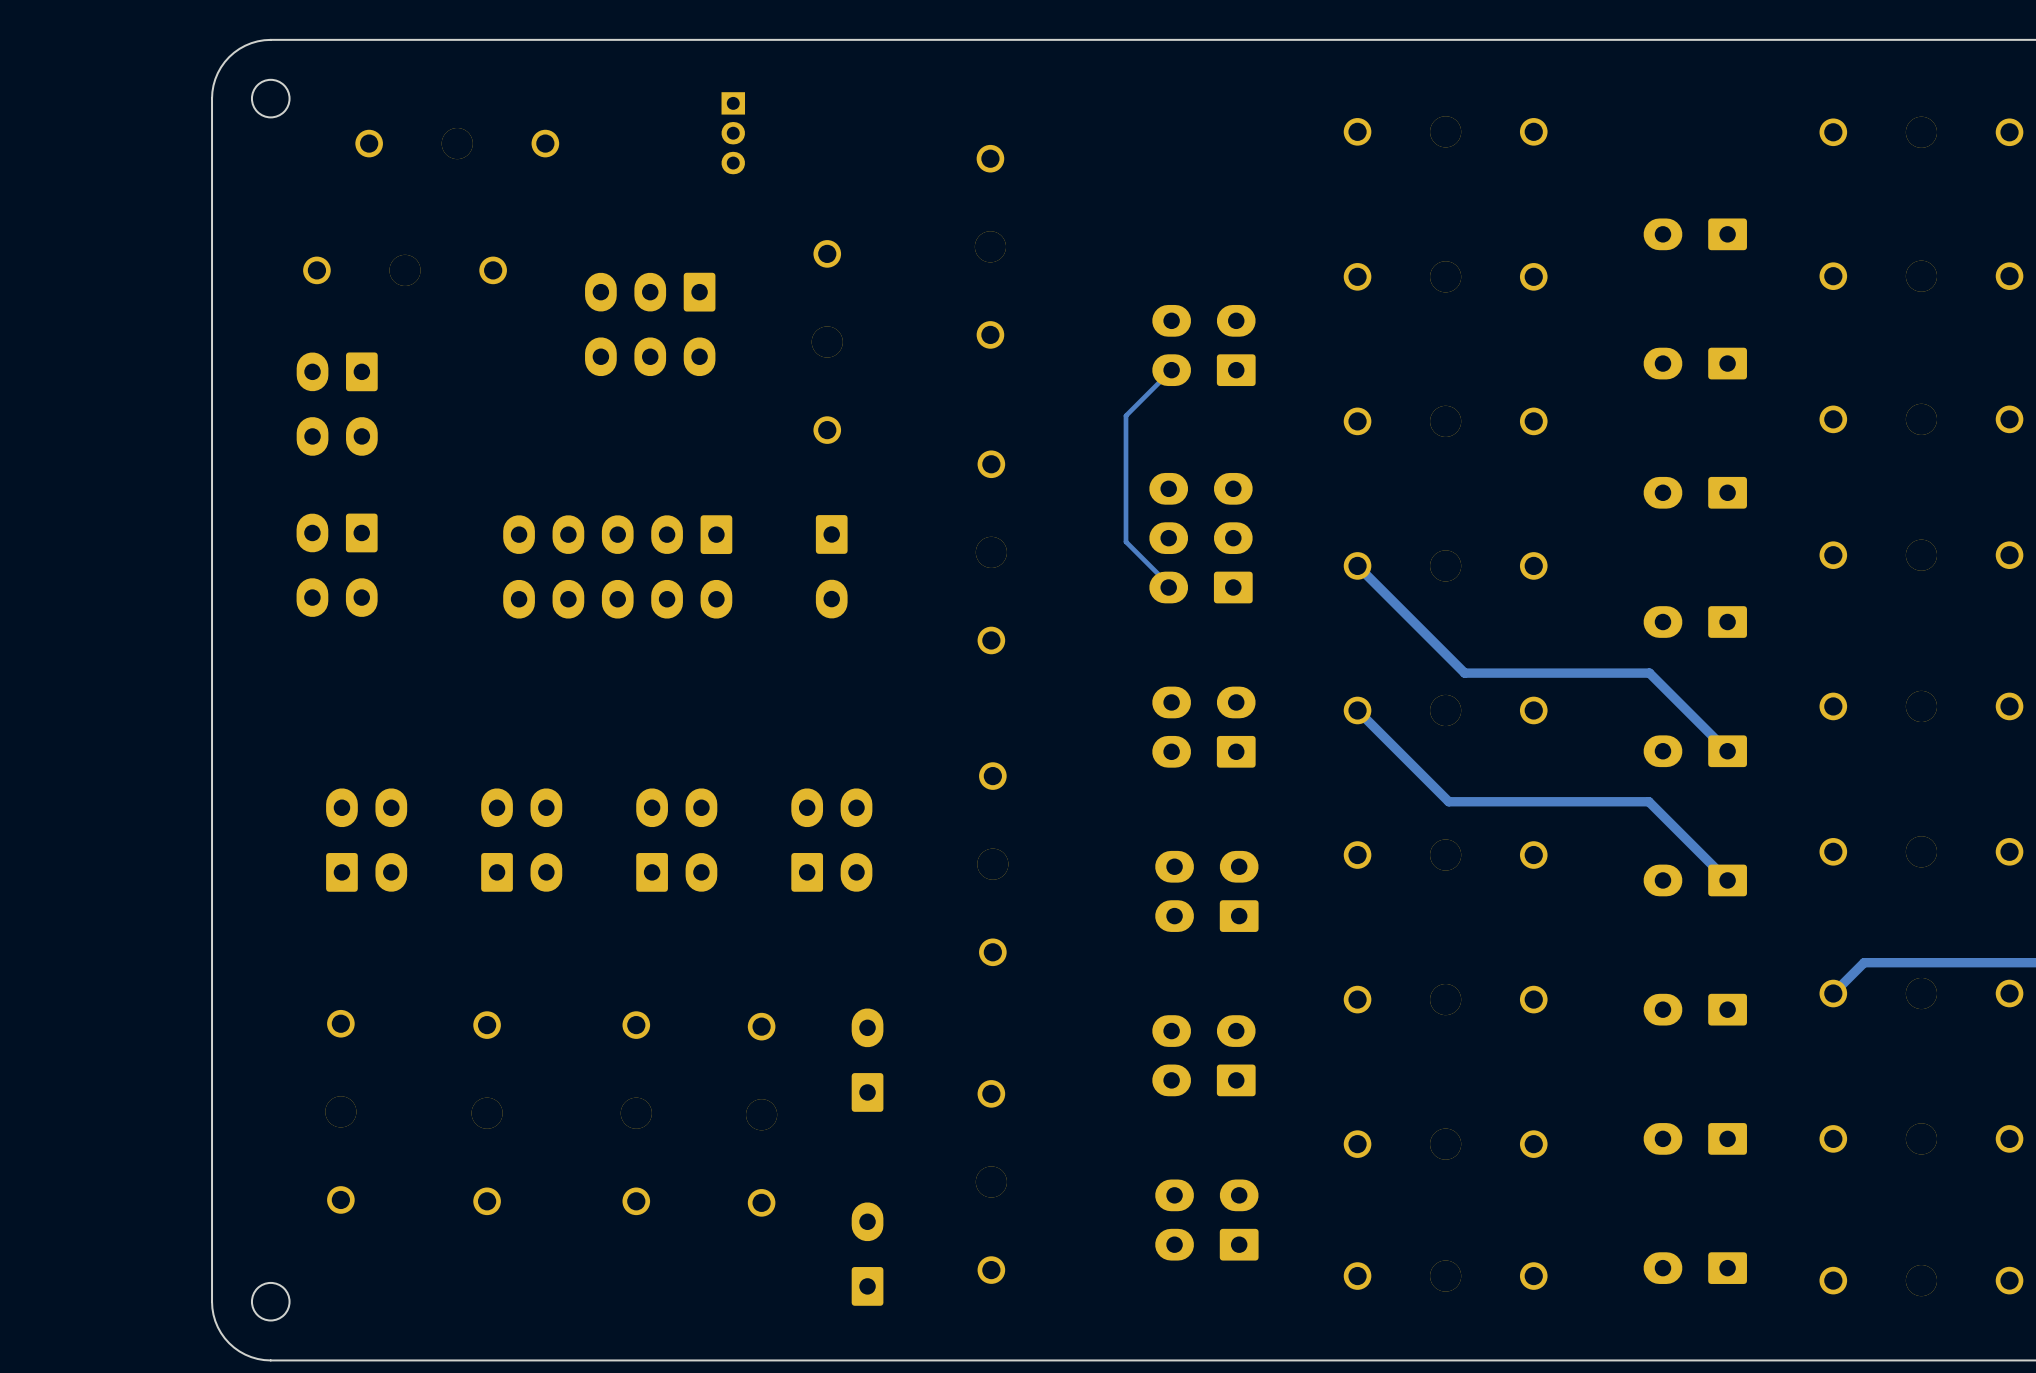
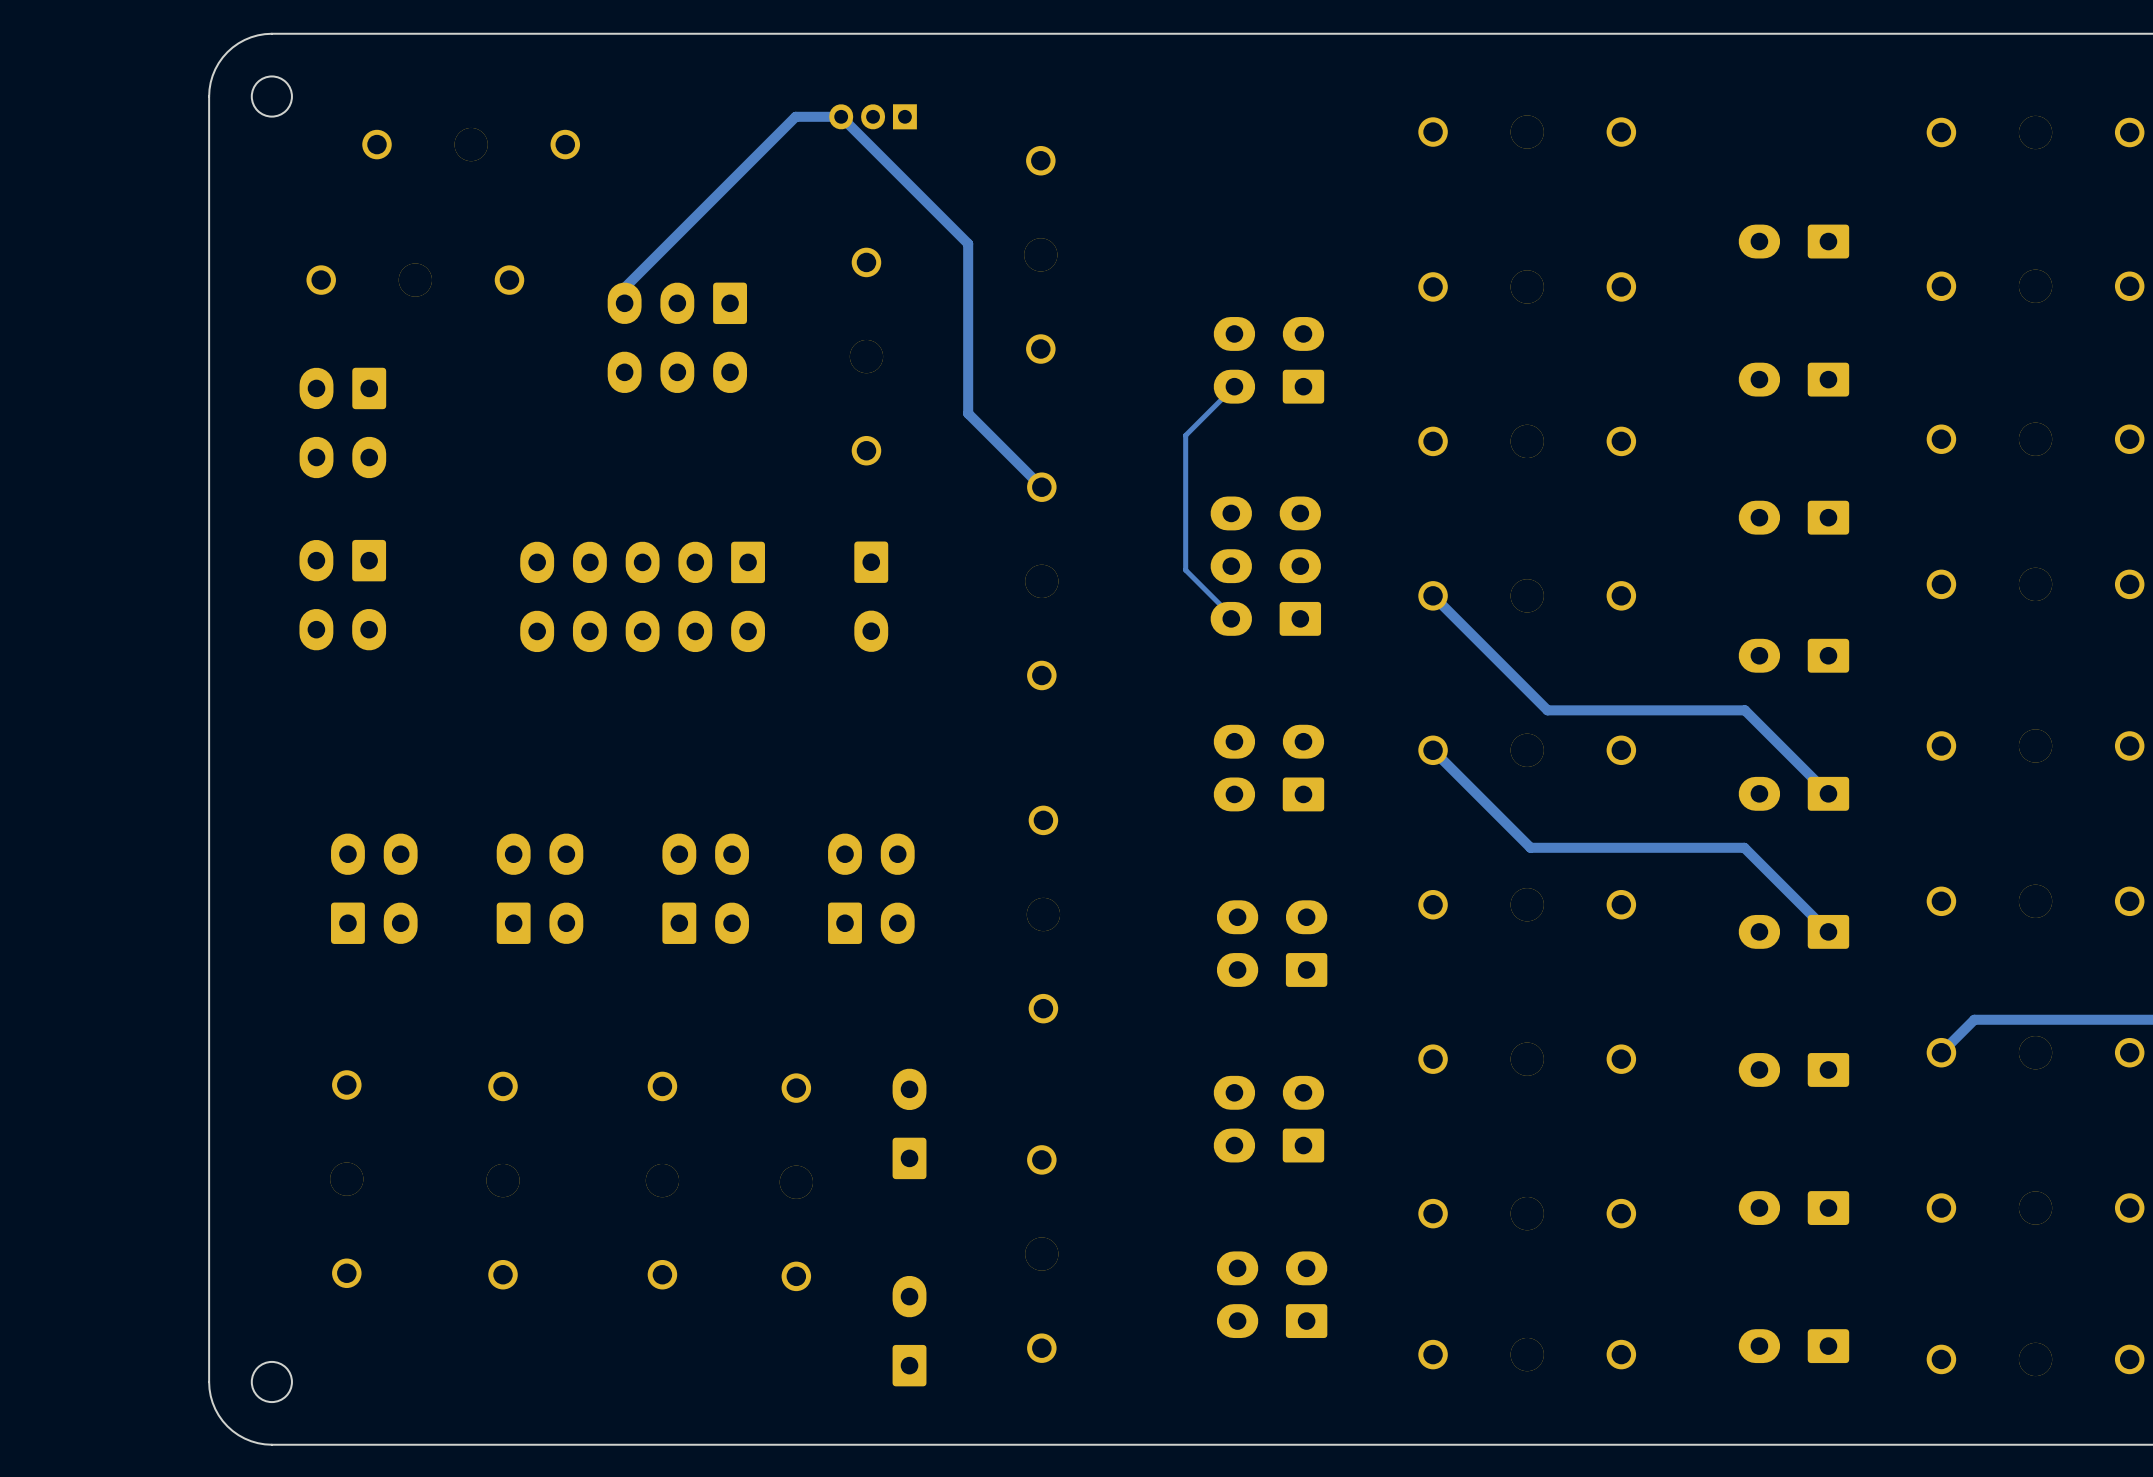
part rotation: 0° (733, 133) -> 90° clockwise (873, 116)
part position: (733, 133) -> (873, 116)
track: none -> (624, 303) (624, 287) (795, 116) (841, 116) (968, 243) (968, 413) (1041, 487)

